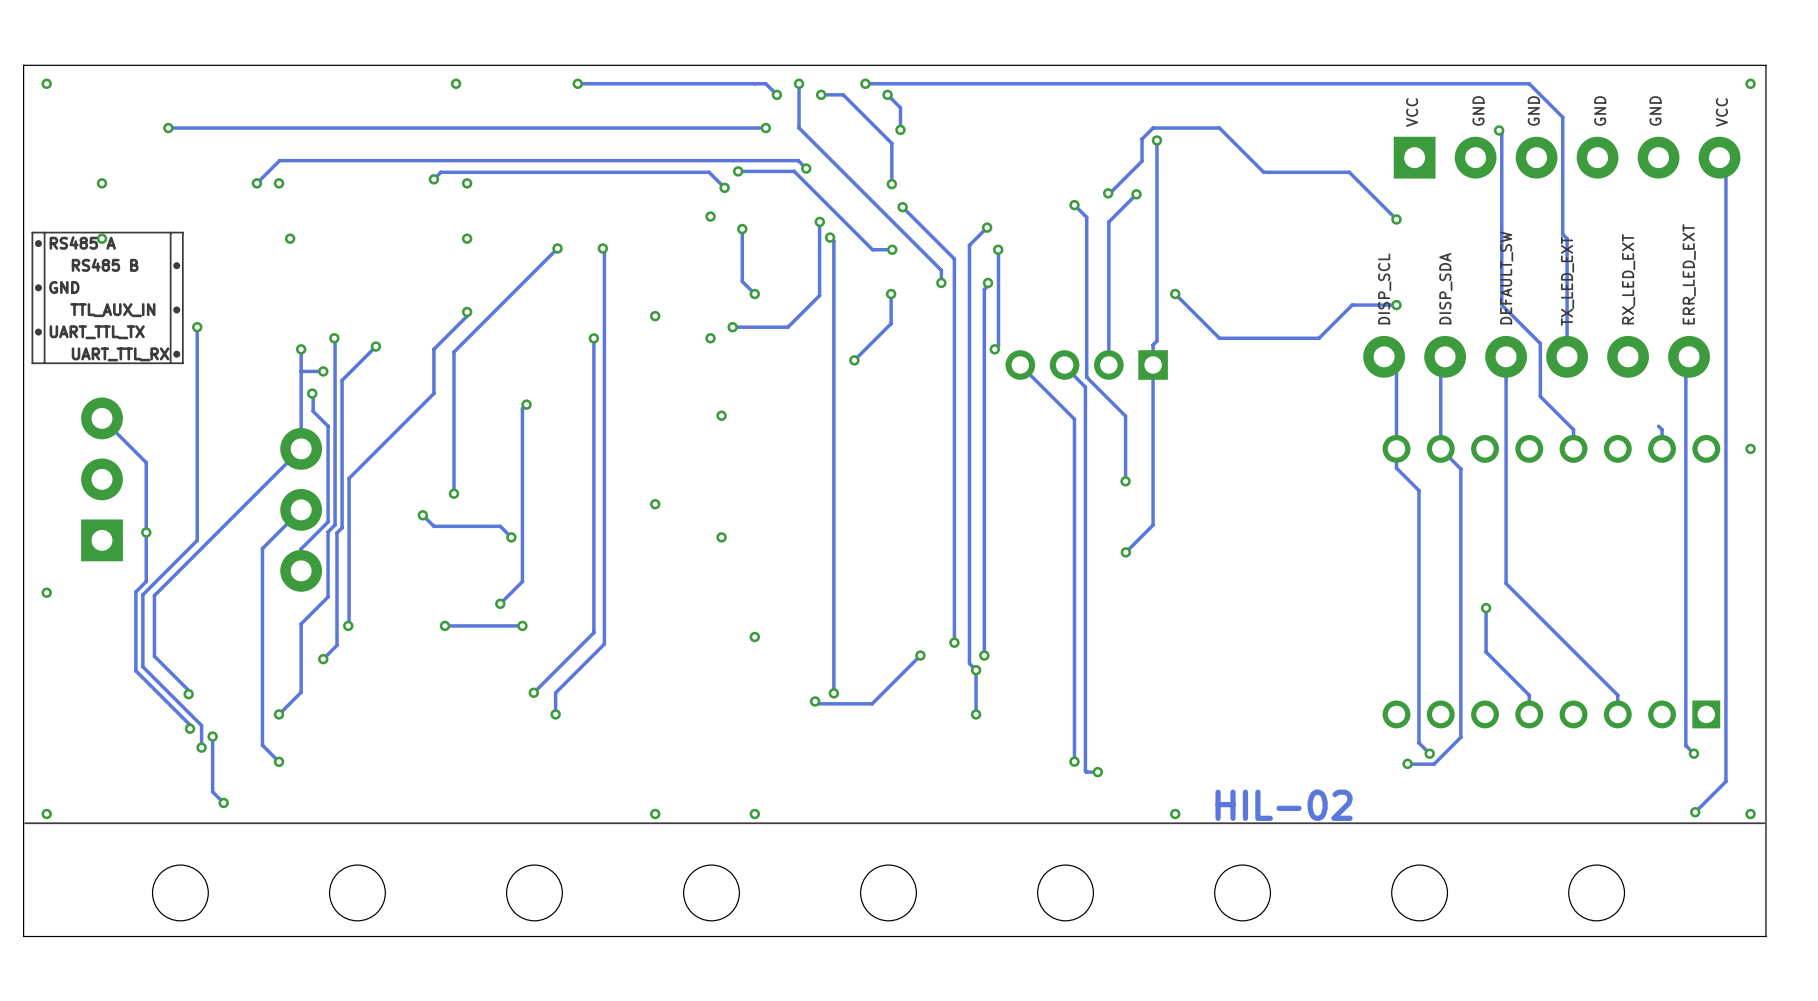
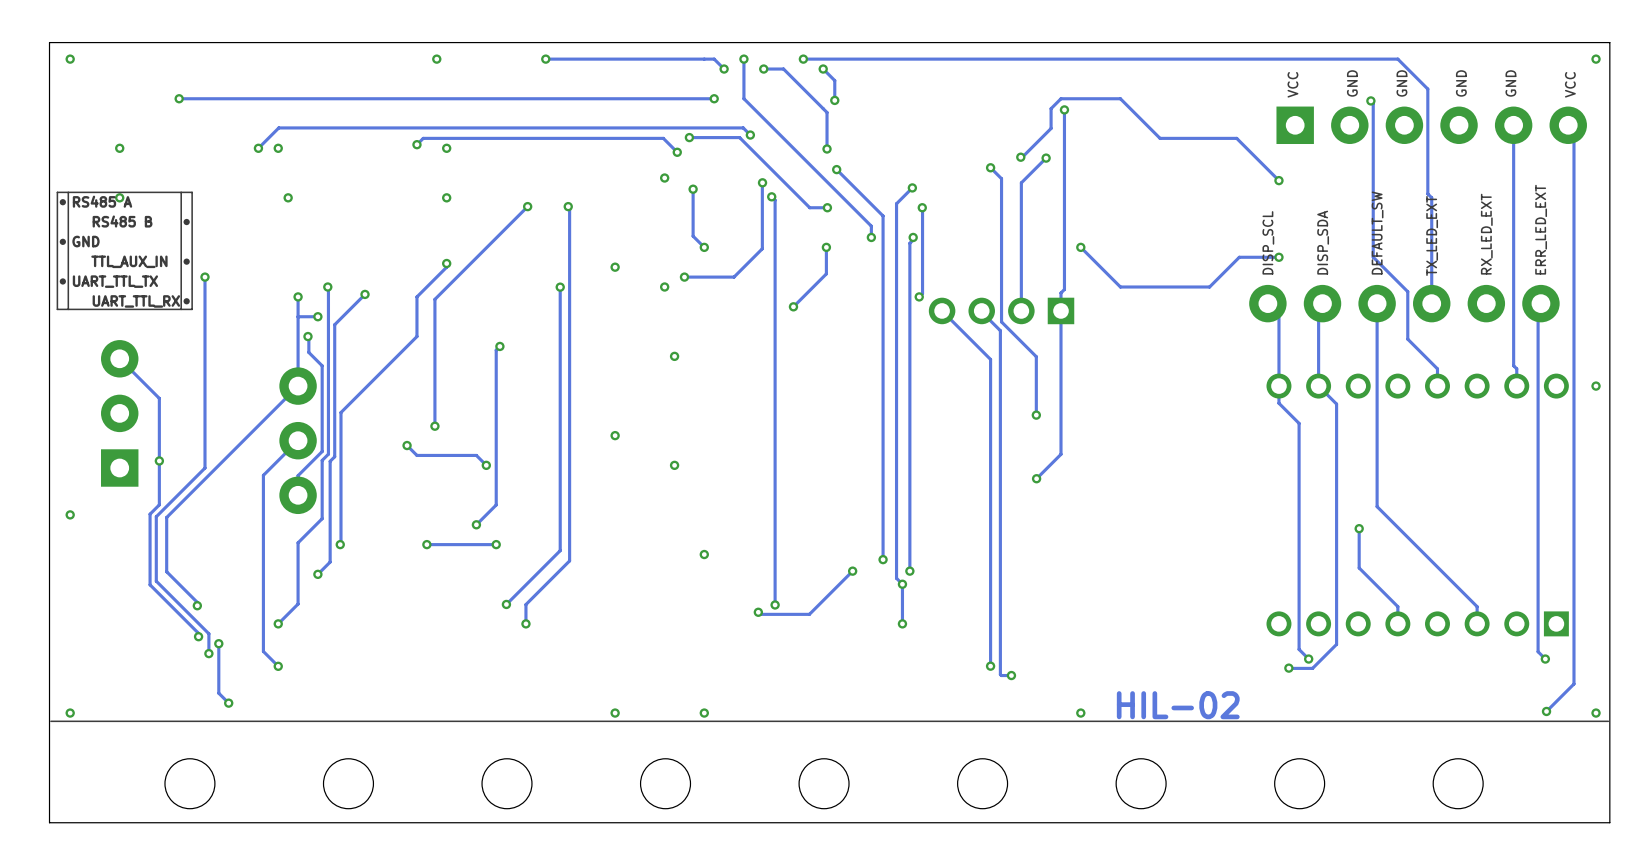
track: none -> (1513, 125) (1513, 365)

